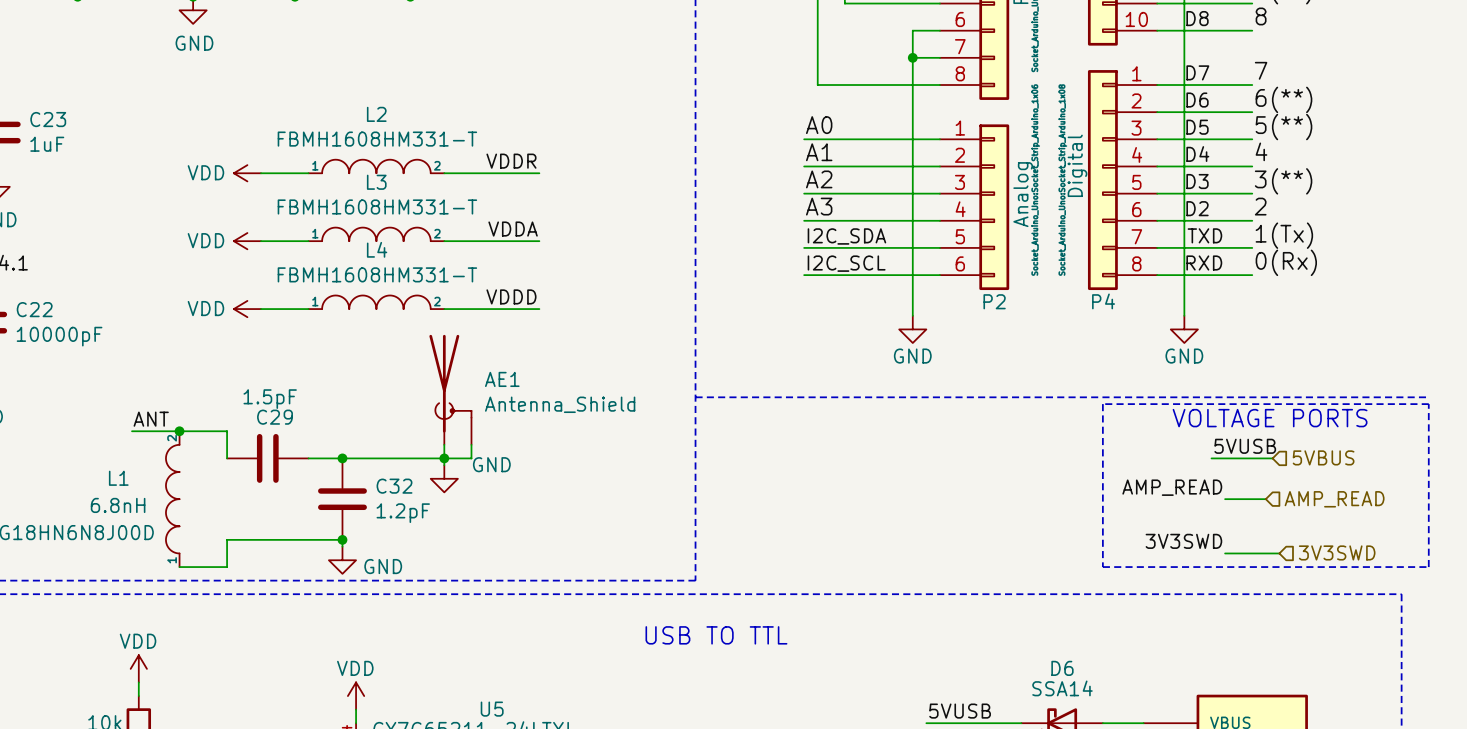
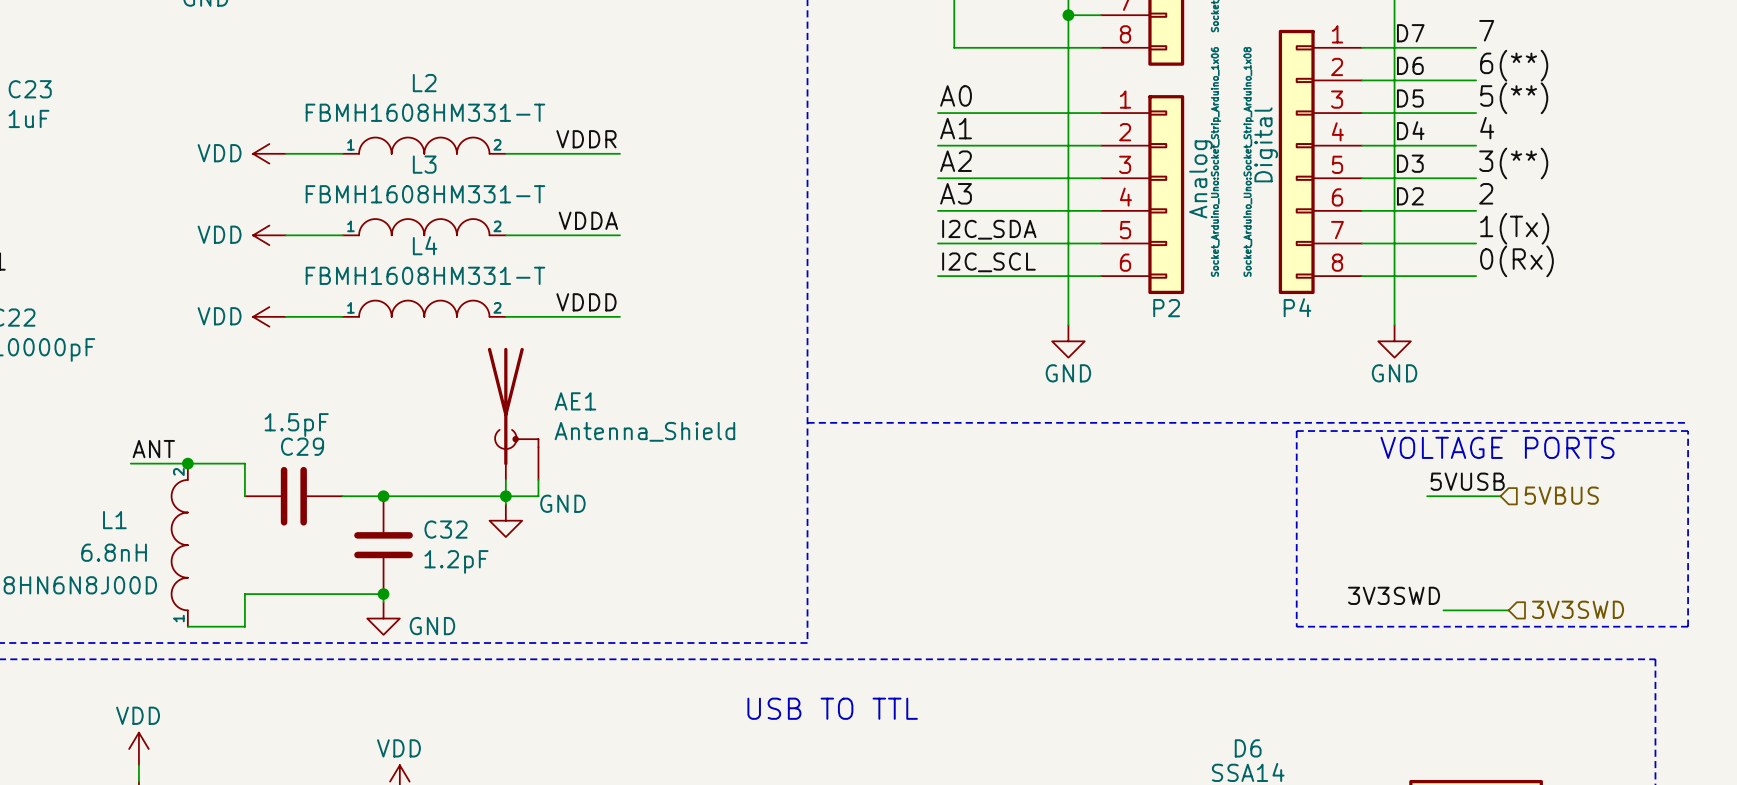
label: TXD (1204, 235) -> none
label: RXD (1204, 262) -> none
label: AMP_READ (1172, 487) -> none
wire: (1225, 499) (1265, 499) -> none
hierarchical label: AMP_READ (1334, 499) -> none

